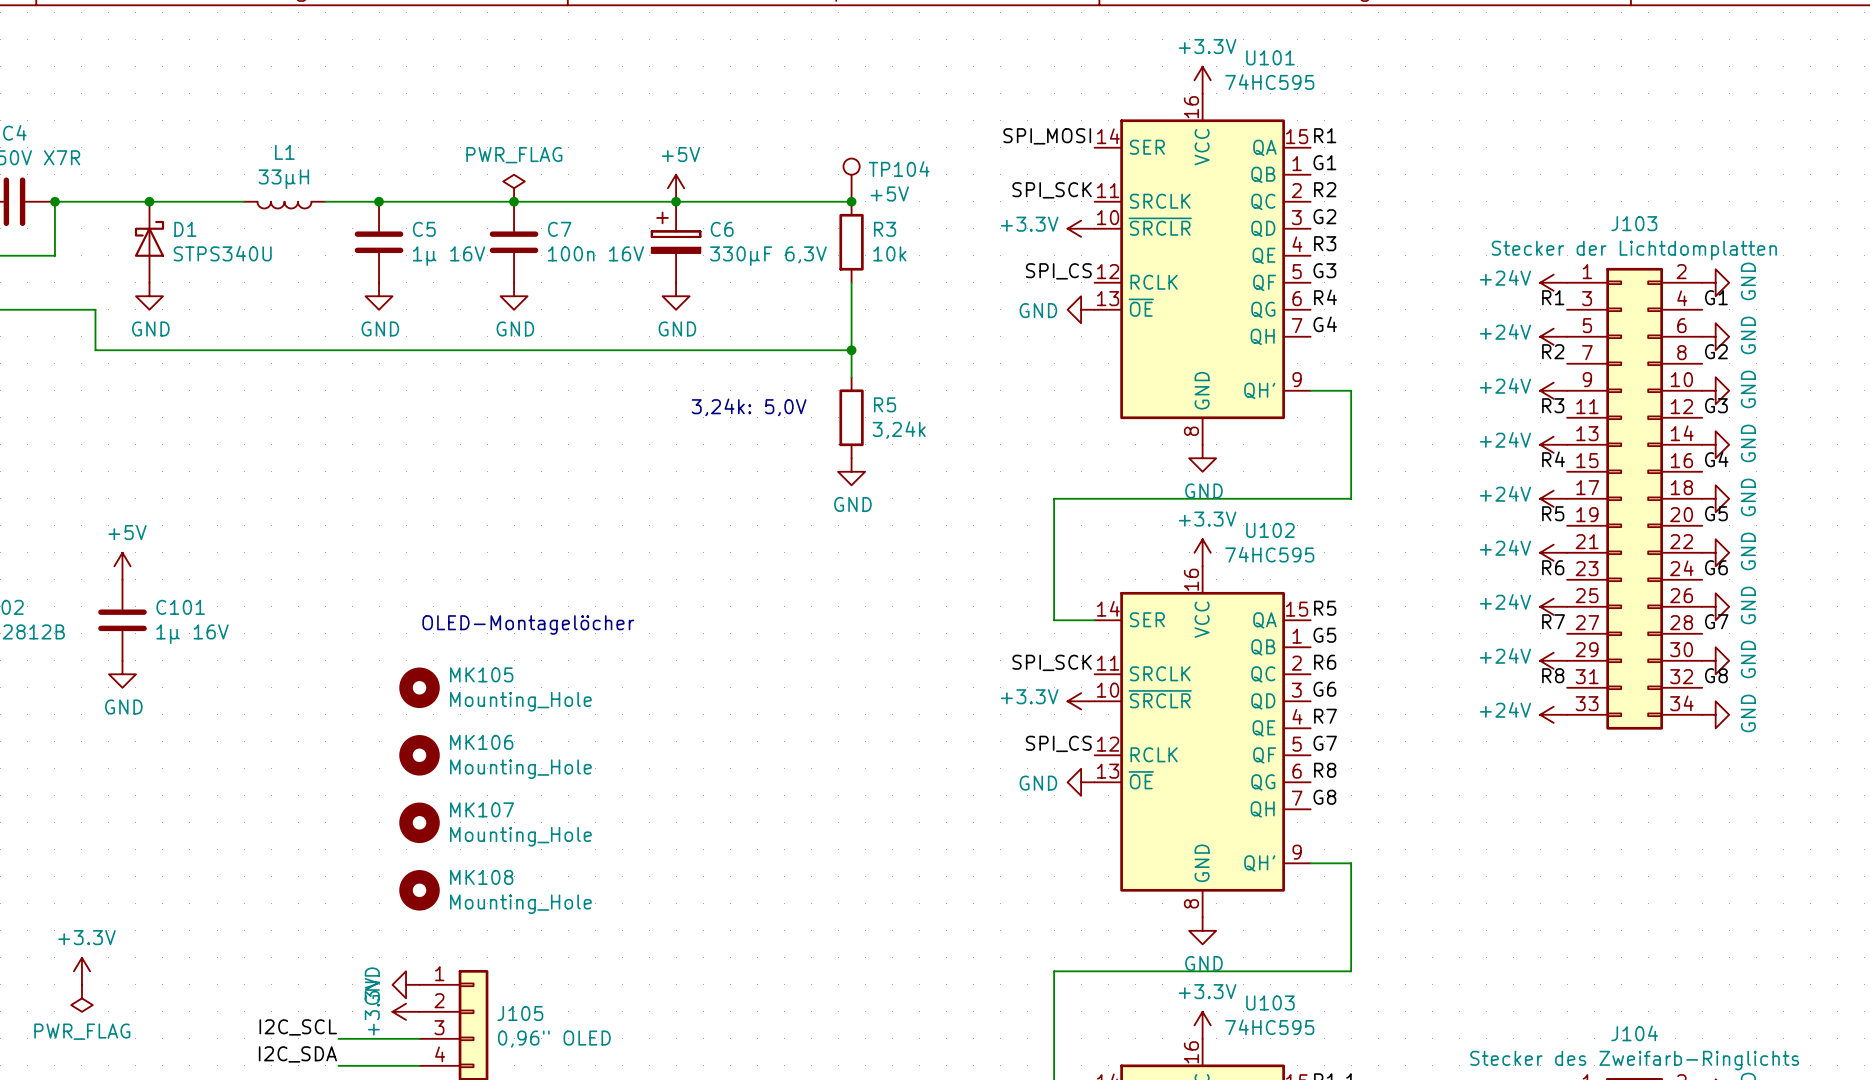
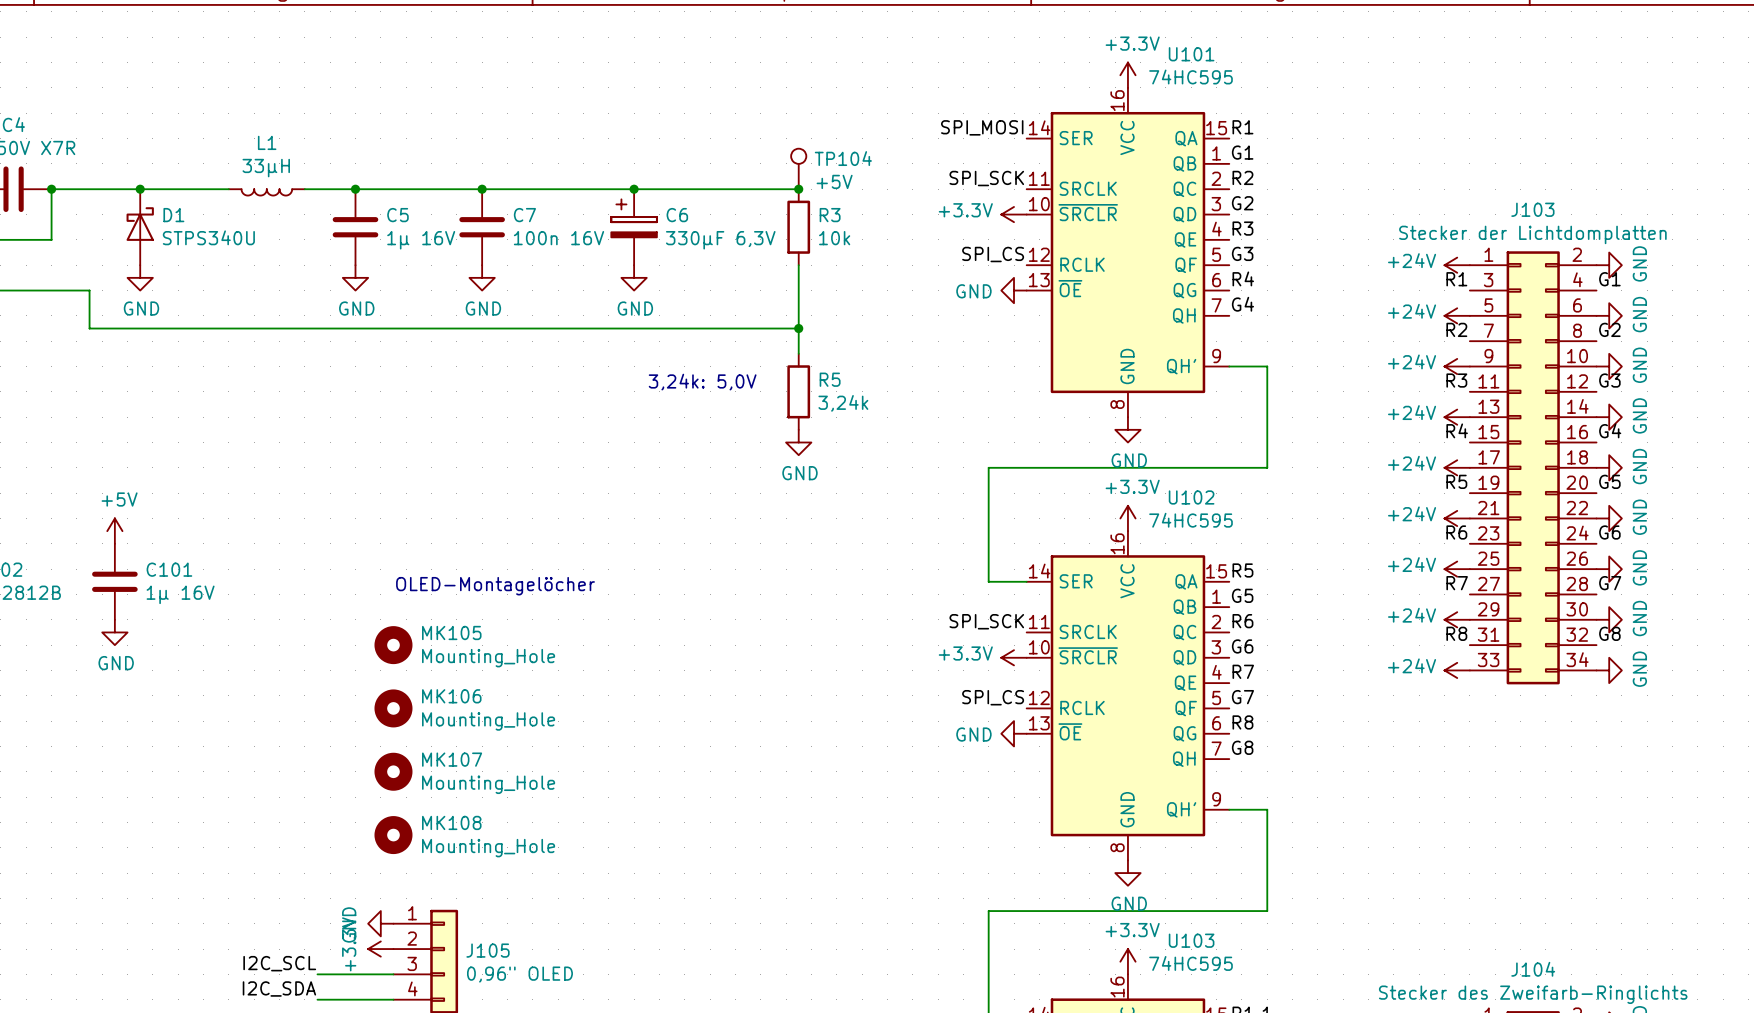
power symbol: PWR_FLAG (514, 188) -> none
power symbol: +5V (676, 188) -> none
power symbol: +3.3V (81, 971) -> none
power symbol: PWR_FLAG (81, 998) -> none

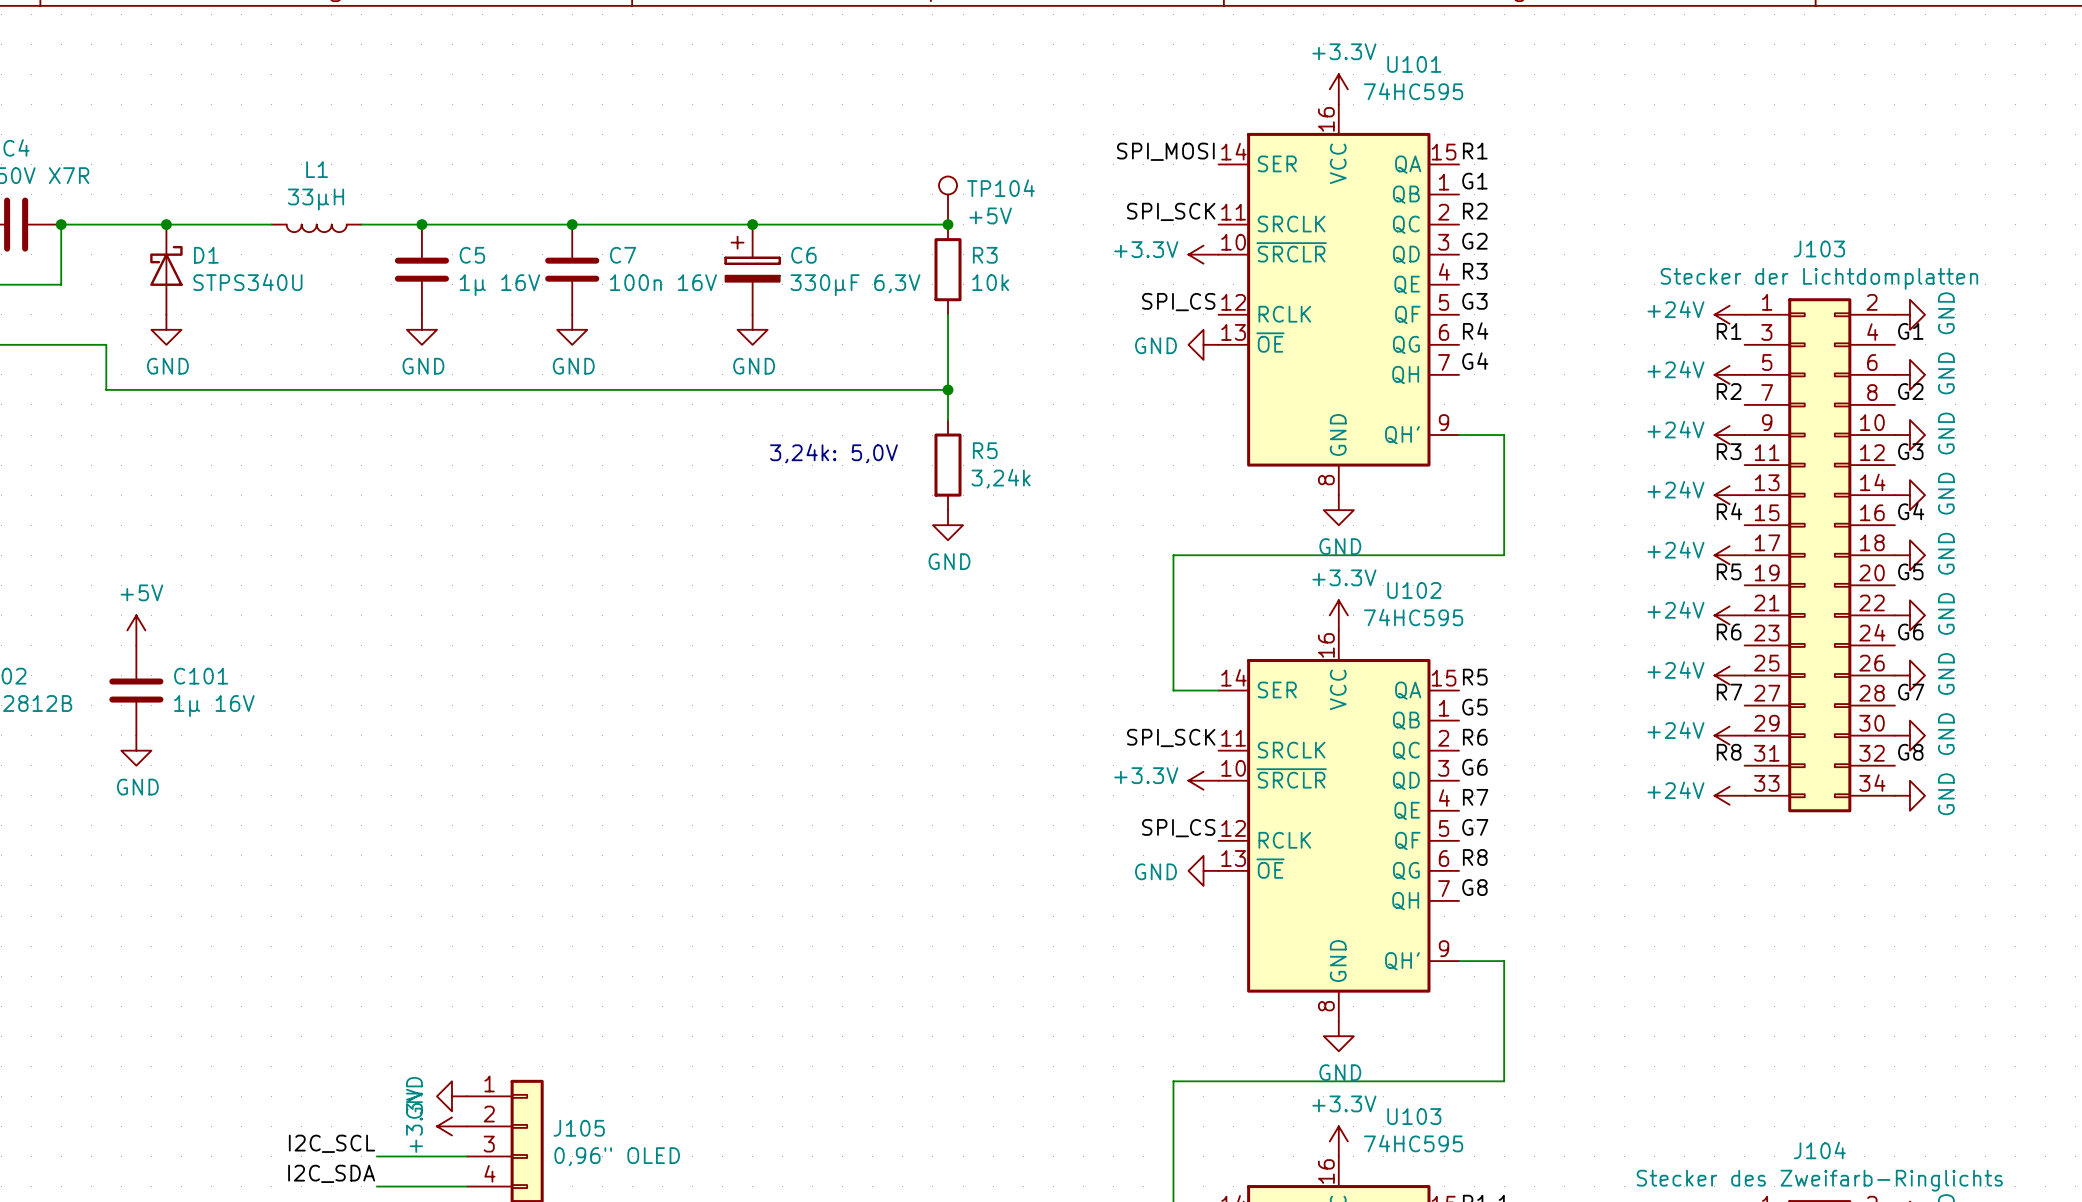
text: OLED-Montagelöcher (495, 586) -> none
MK105: Mounting_Hole (393, 645) -> none
MK106: Mounting_Hole (393, 708) -> none
MK107: Mounting_Hole (393, 771) -> none
MK108: Mounting_Hole (393, 835) -> none

